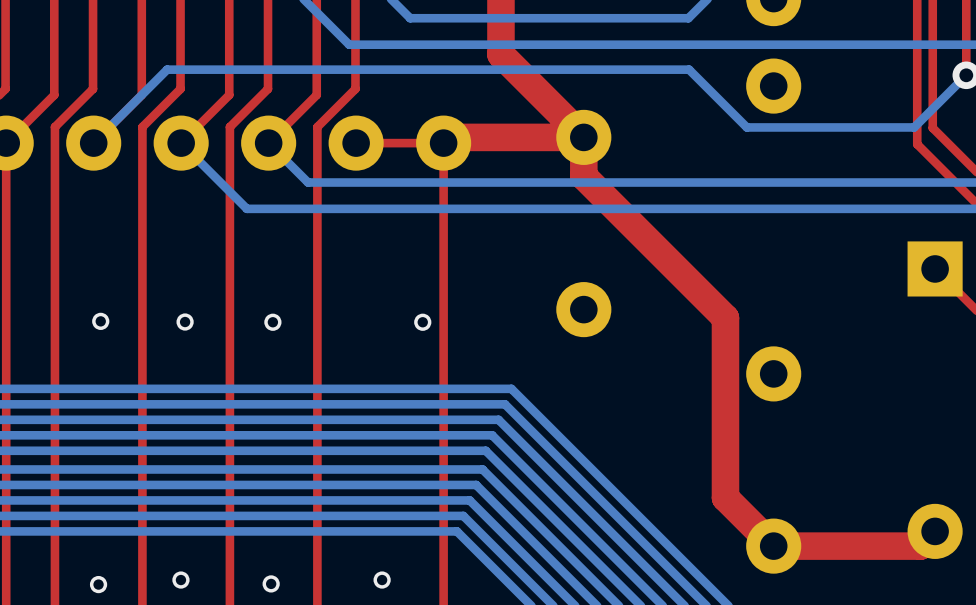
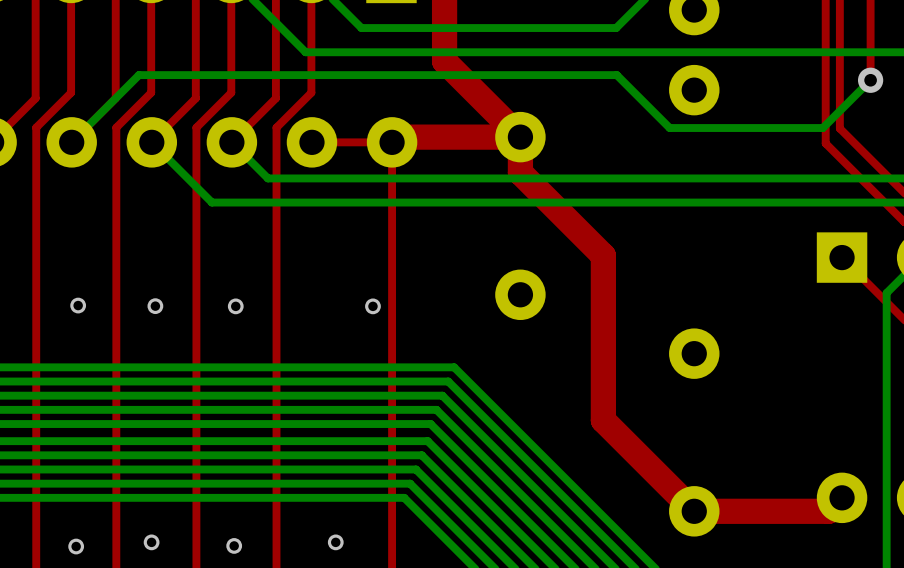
top track: (674, 266) (725, 318) (725, 497) -> (603, 255) (603, 420) (650, 467)

